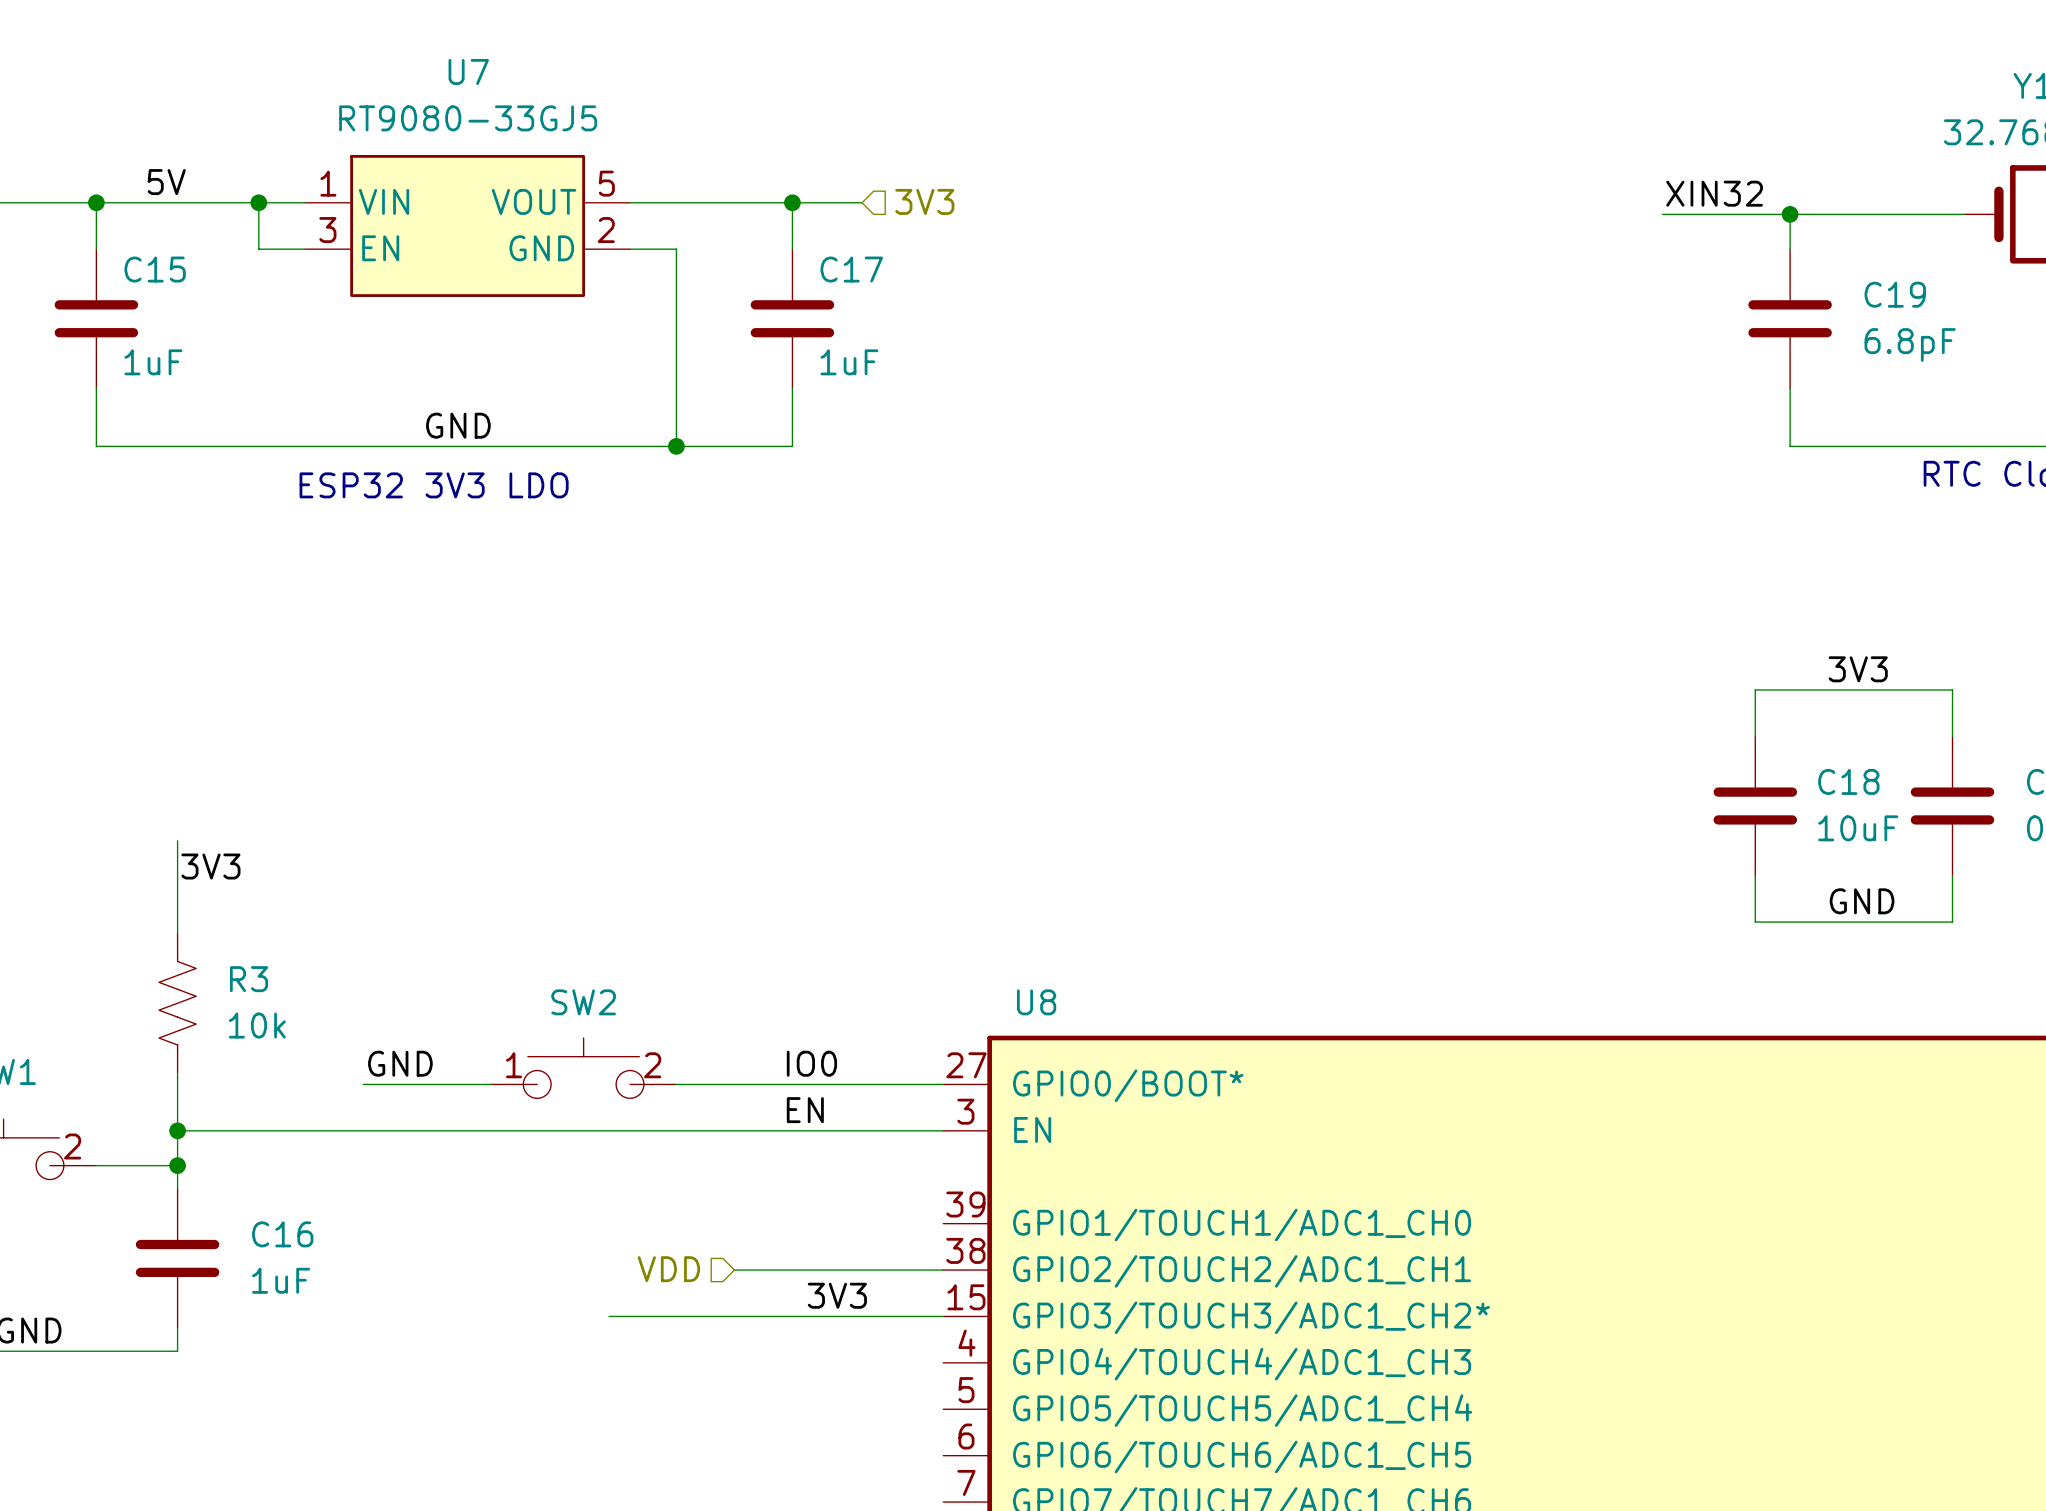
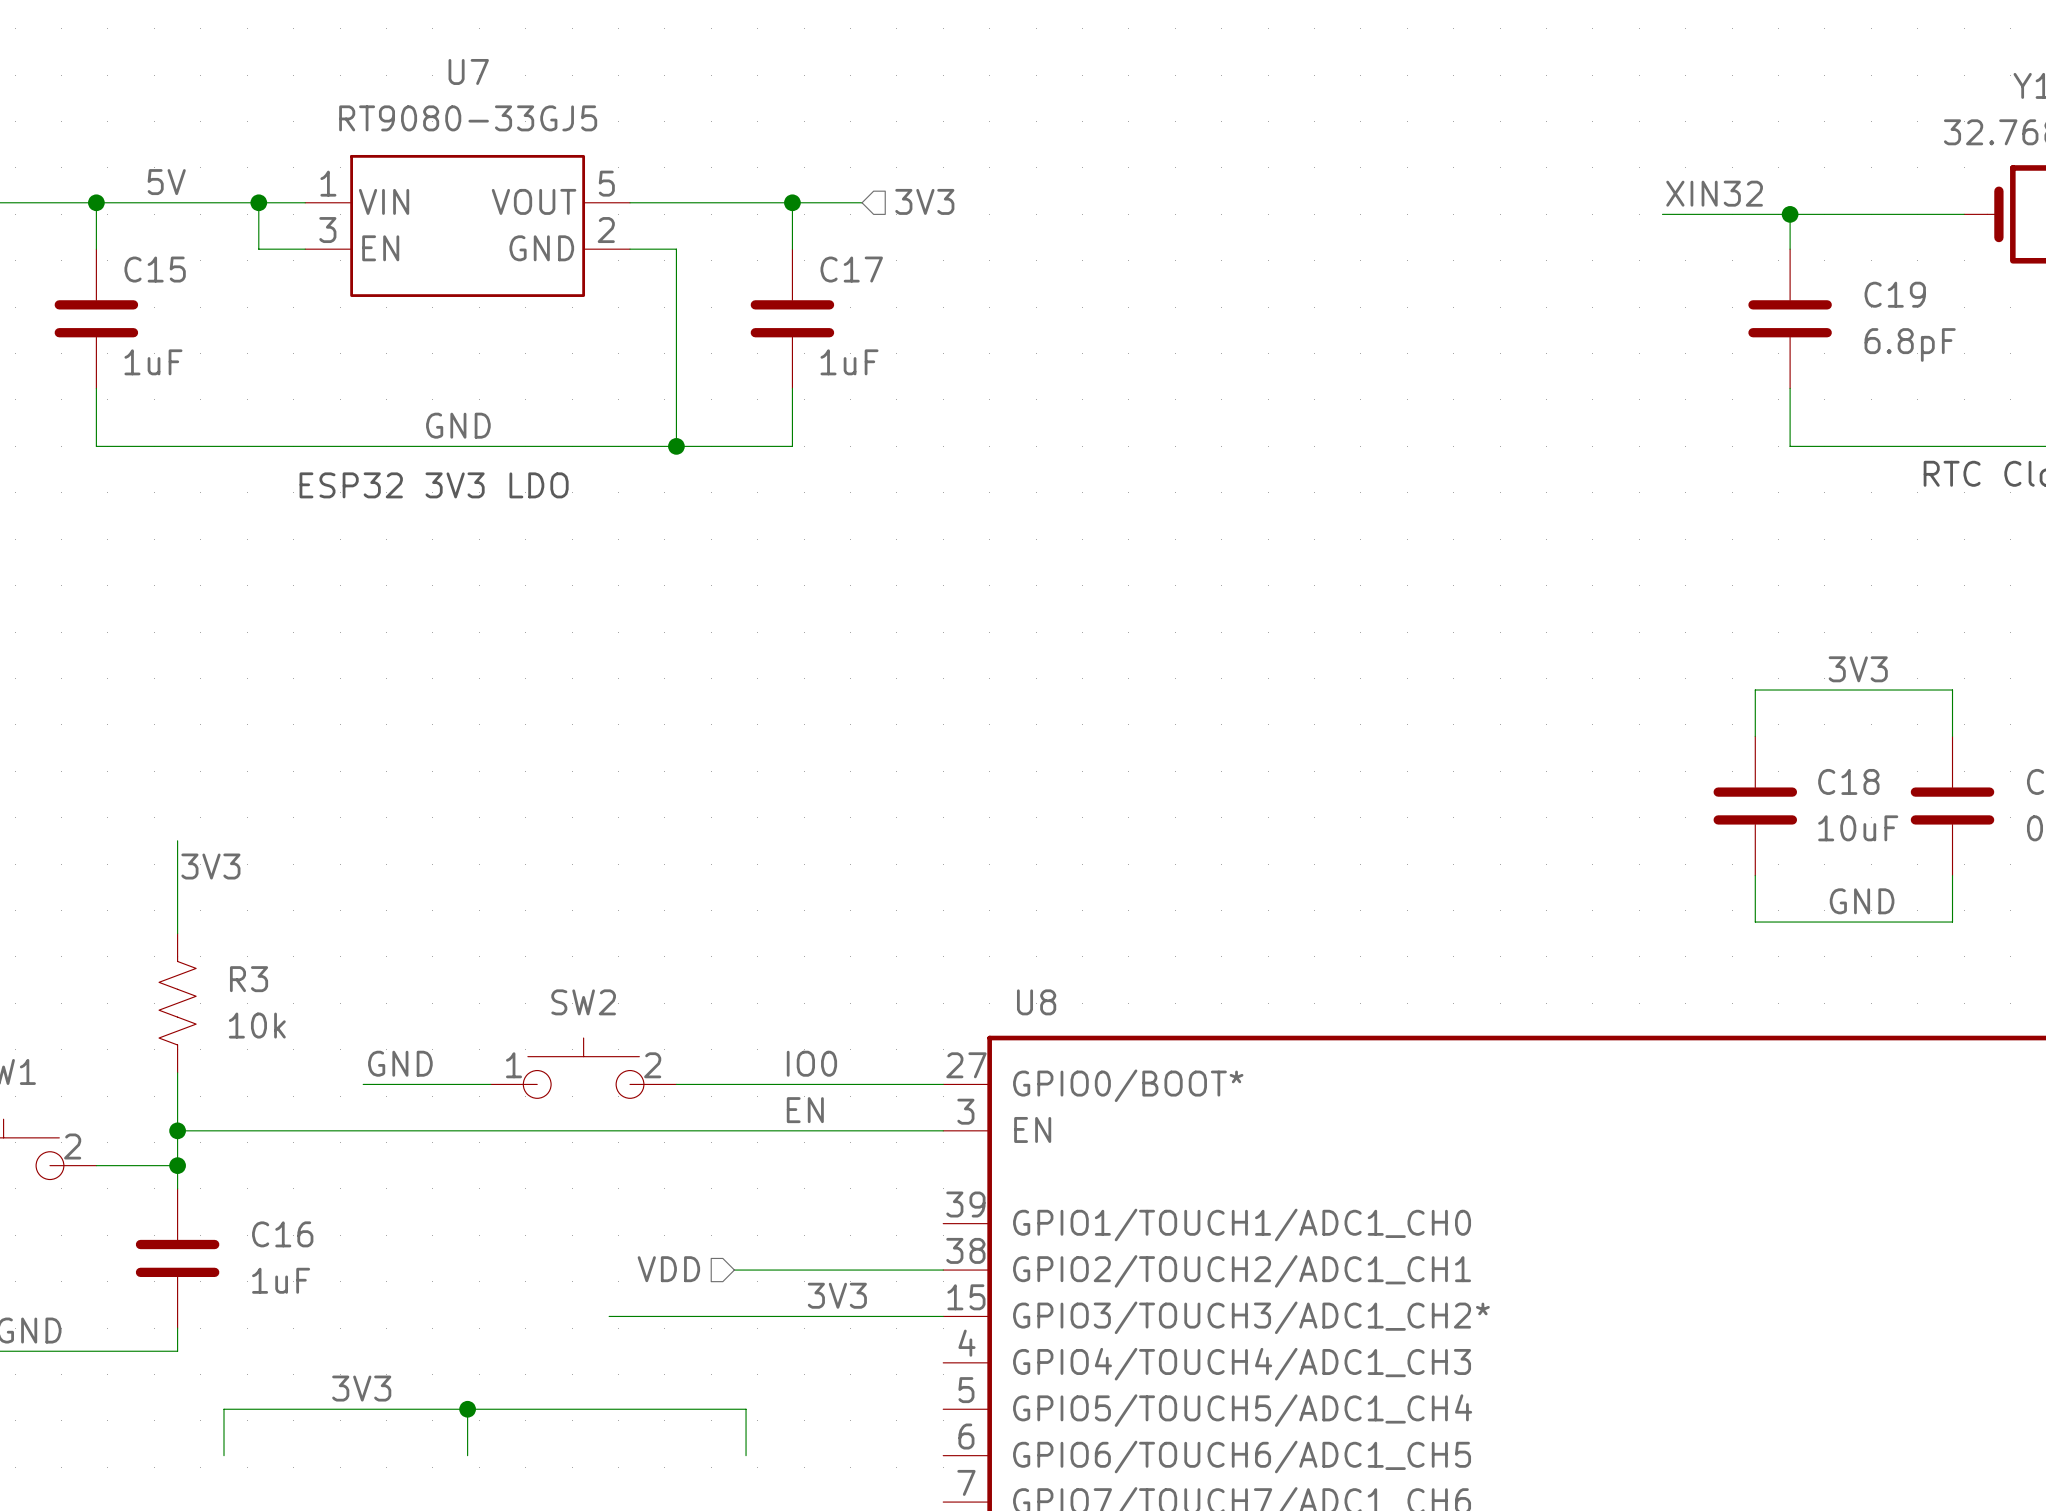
label: none -> 3V3 (361, 1388)
wire: none -> (467, 1409) (467, 1455)
junction: none -> (467, 1409)
wire: none -> (223, 1455) (223, 1409) (746, 1409) (746, 1455)

